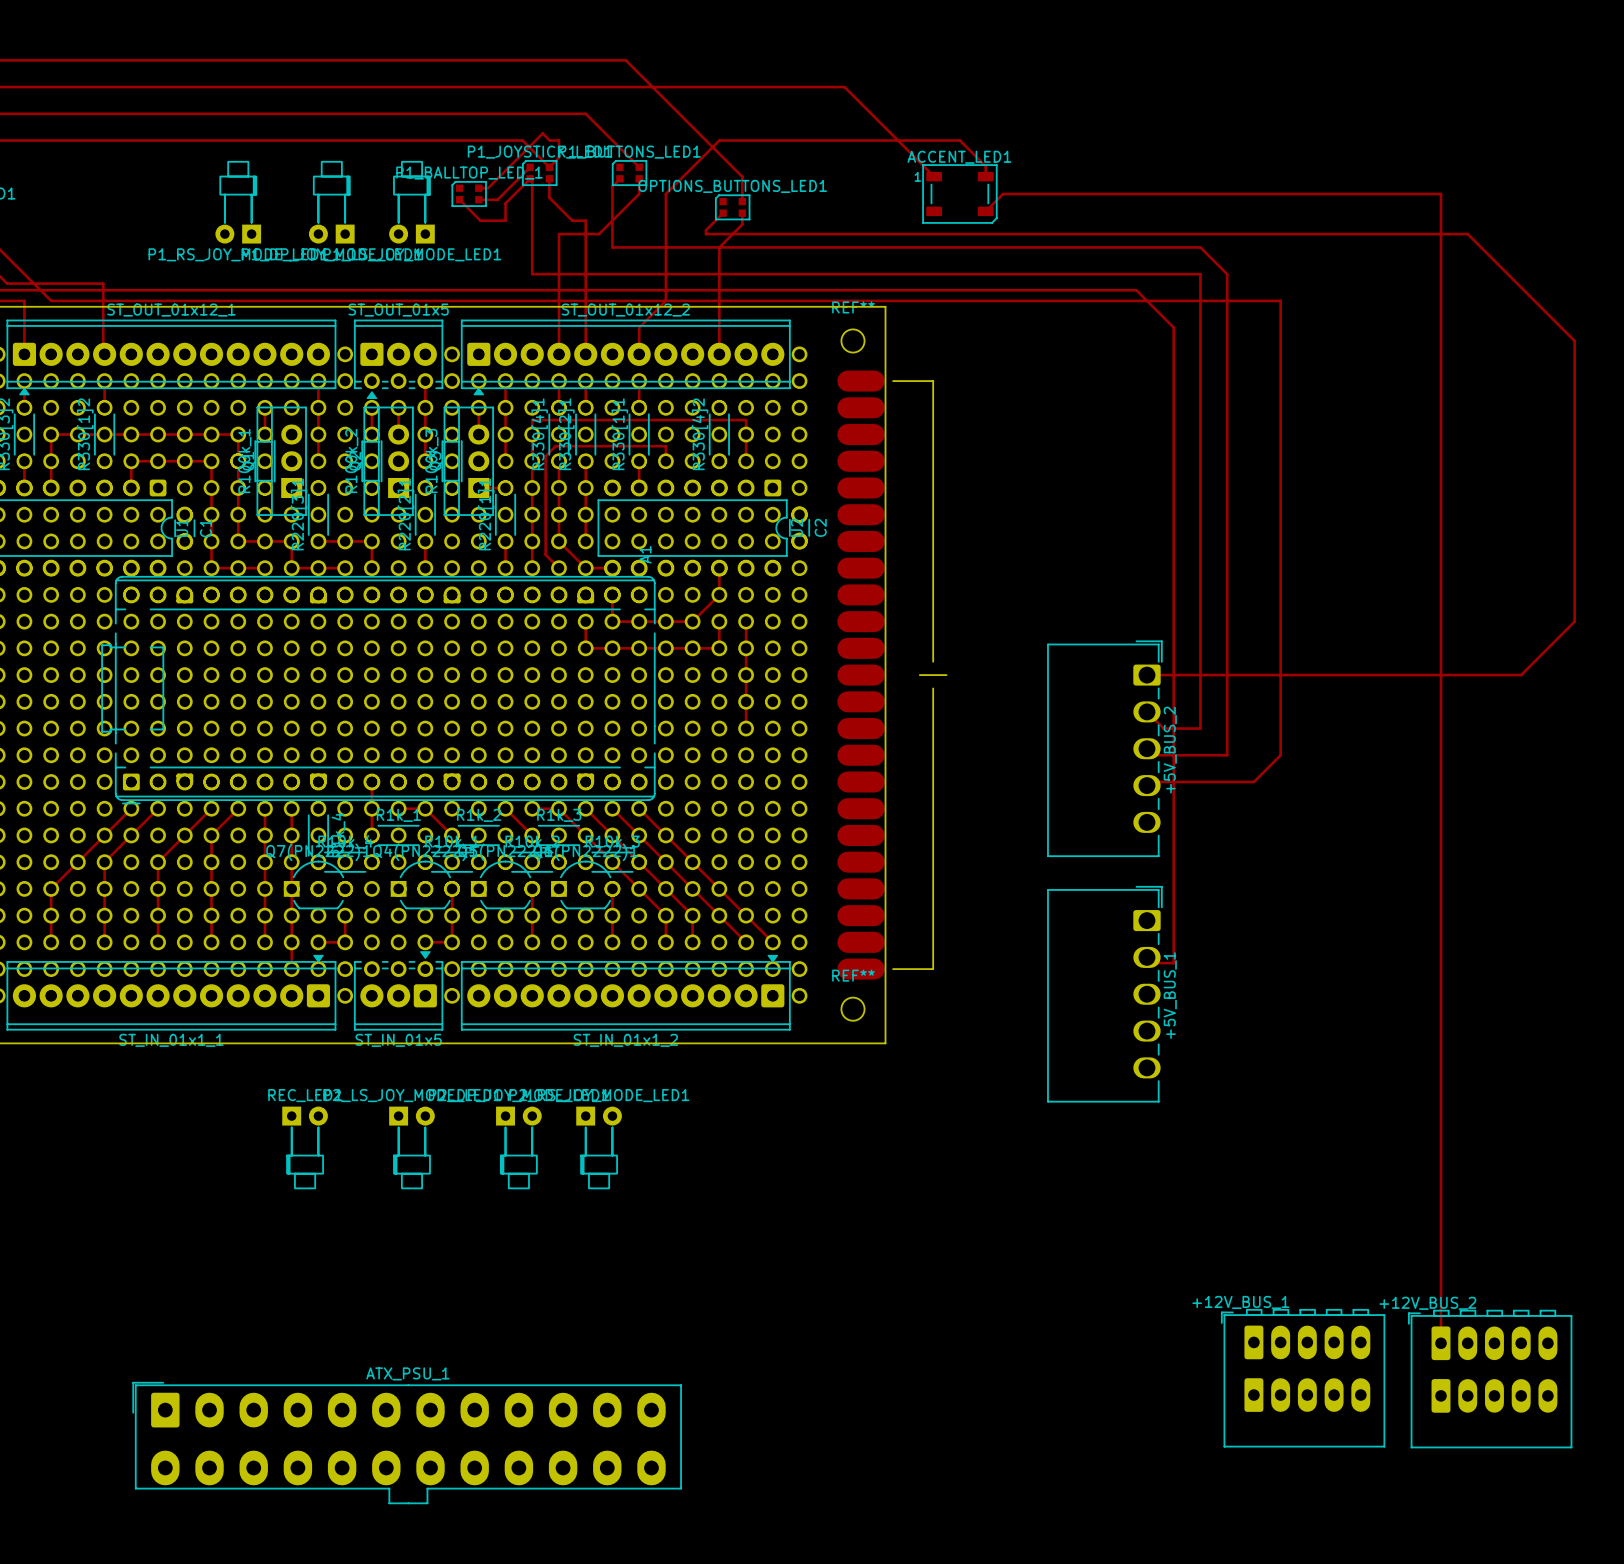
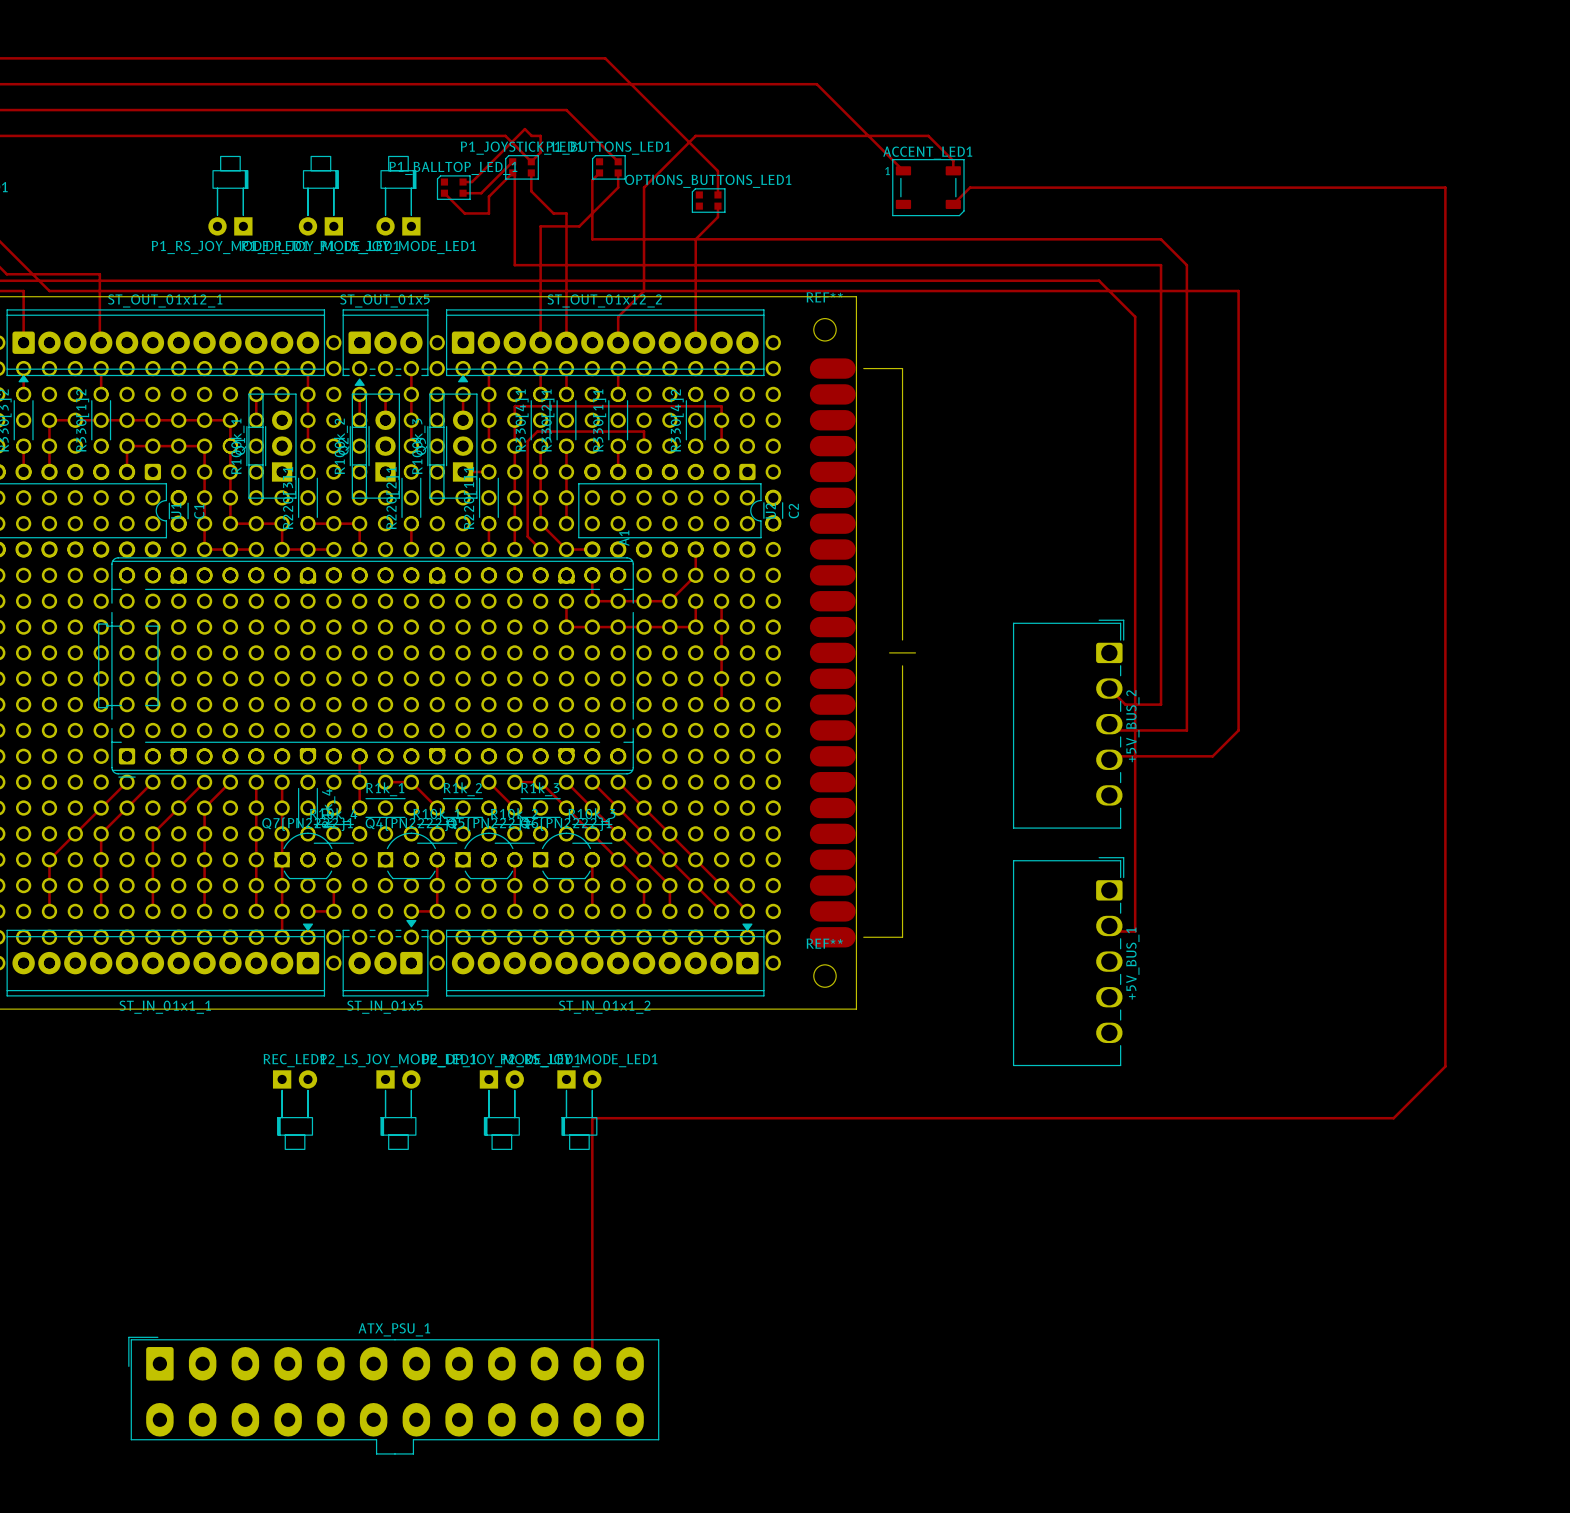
track: (1441, 193) (1441, 1343) -> (1393, 187) (1445, 187) (1445, 1066) (1393, 1118) (592, 1118) (592, 1358) (587, 1363)
track: (723, 213) (705, 230) (705, 234) (1467, 234) (1574, 340) (1574, 621) (1521, 675) (1146, 675) -> none
+12V_BUS_1: (1303, 1378) -> none
+12V_BUS_2: (1490, 1379) -> none

